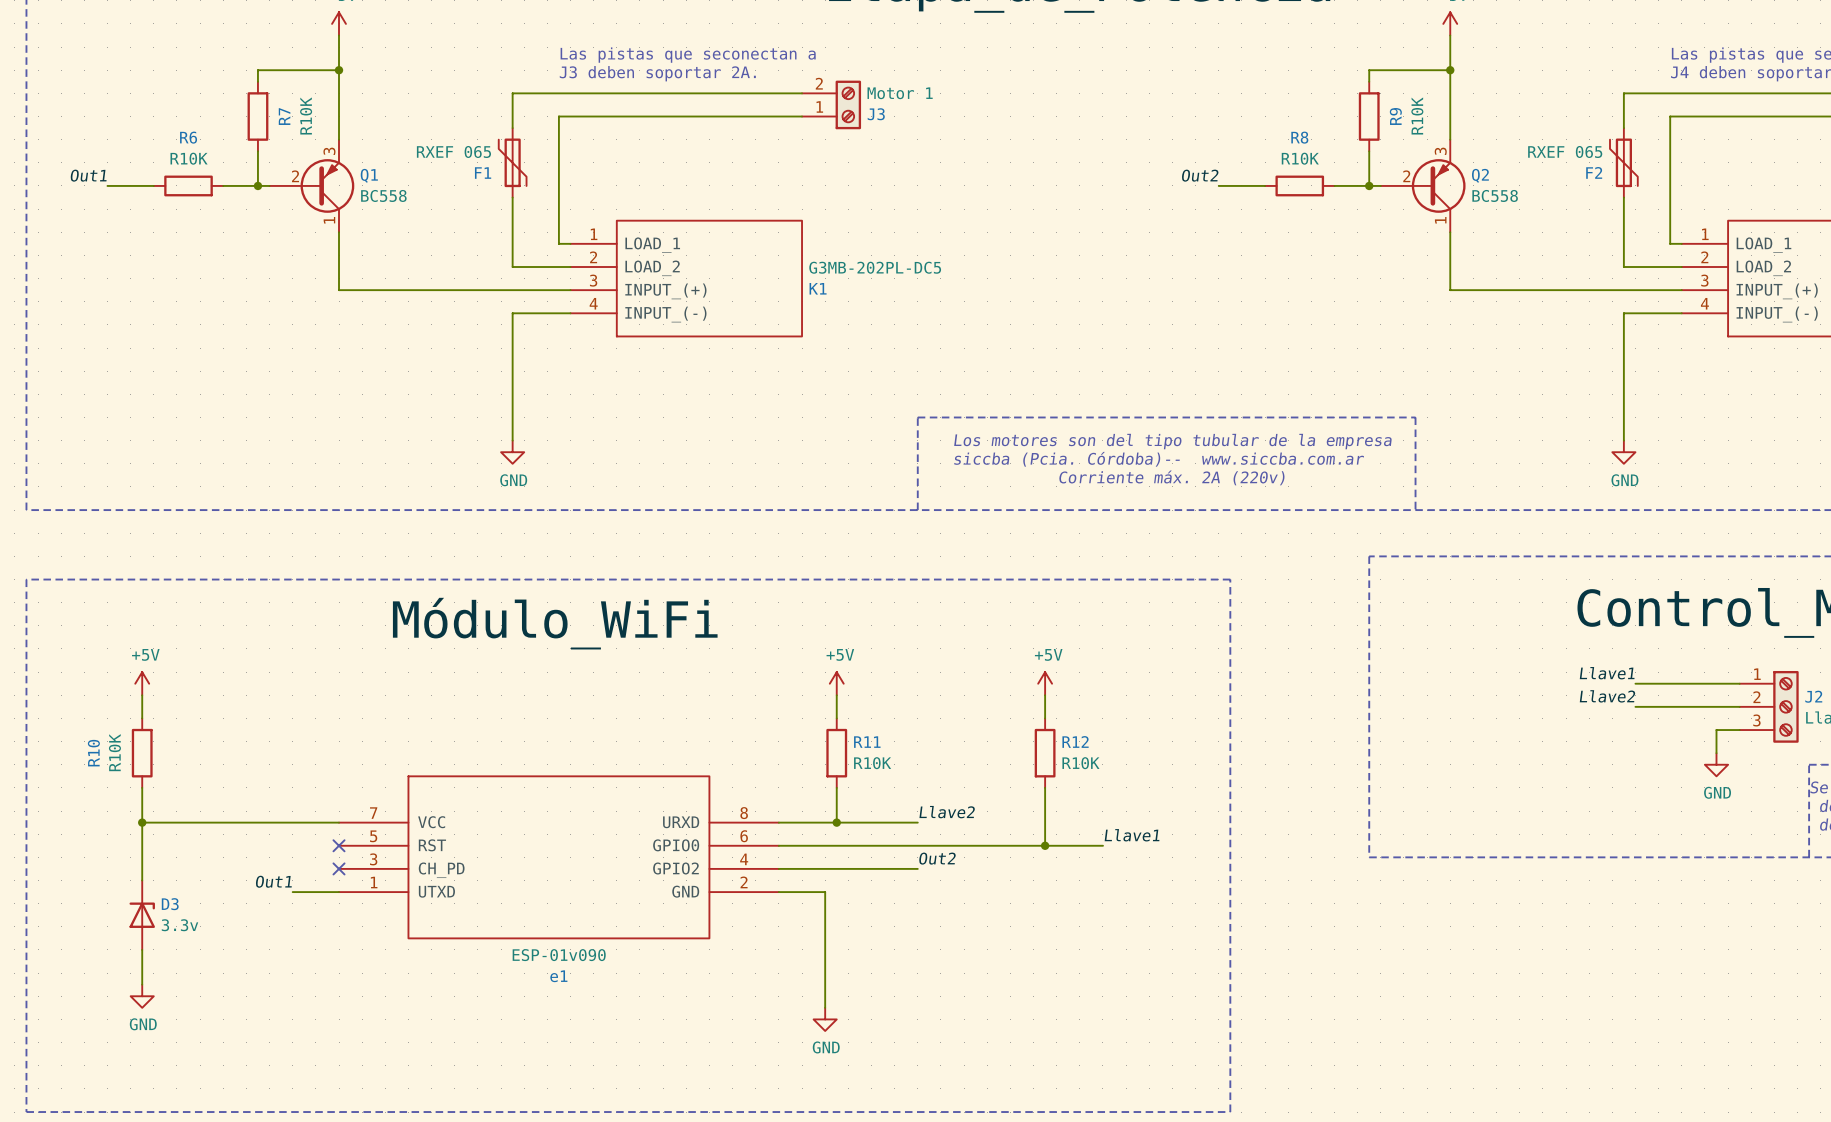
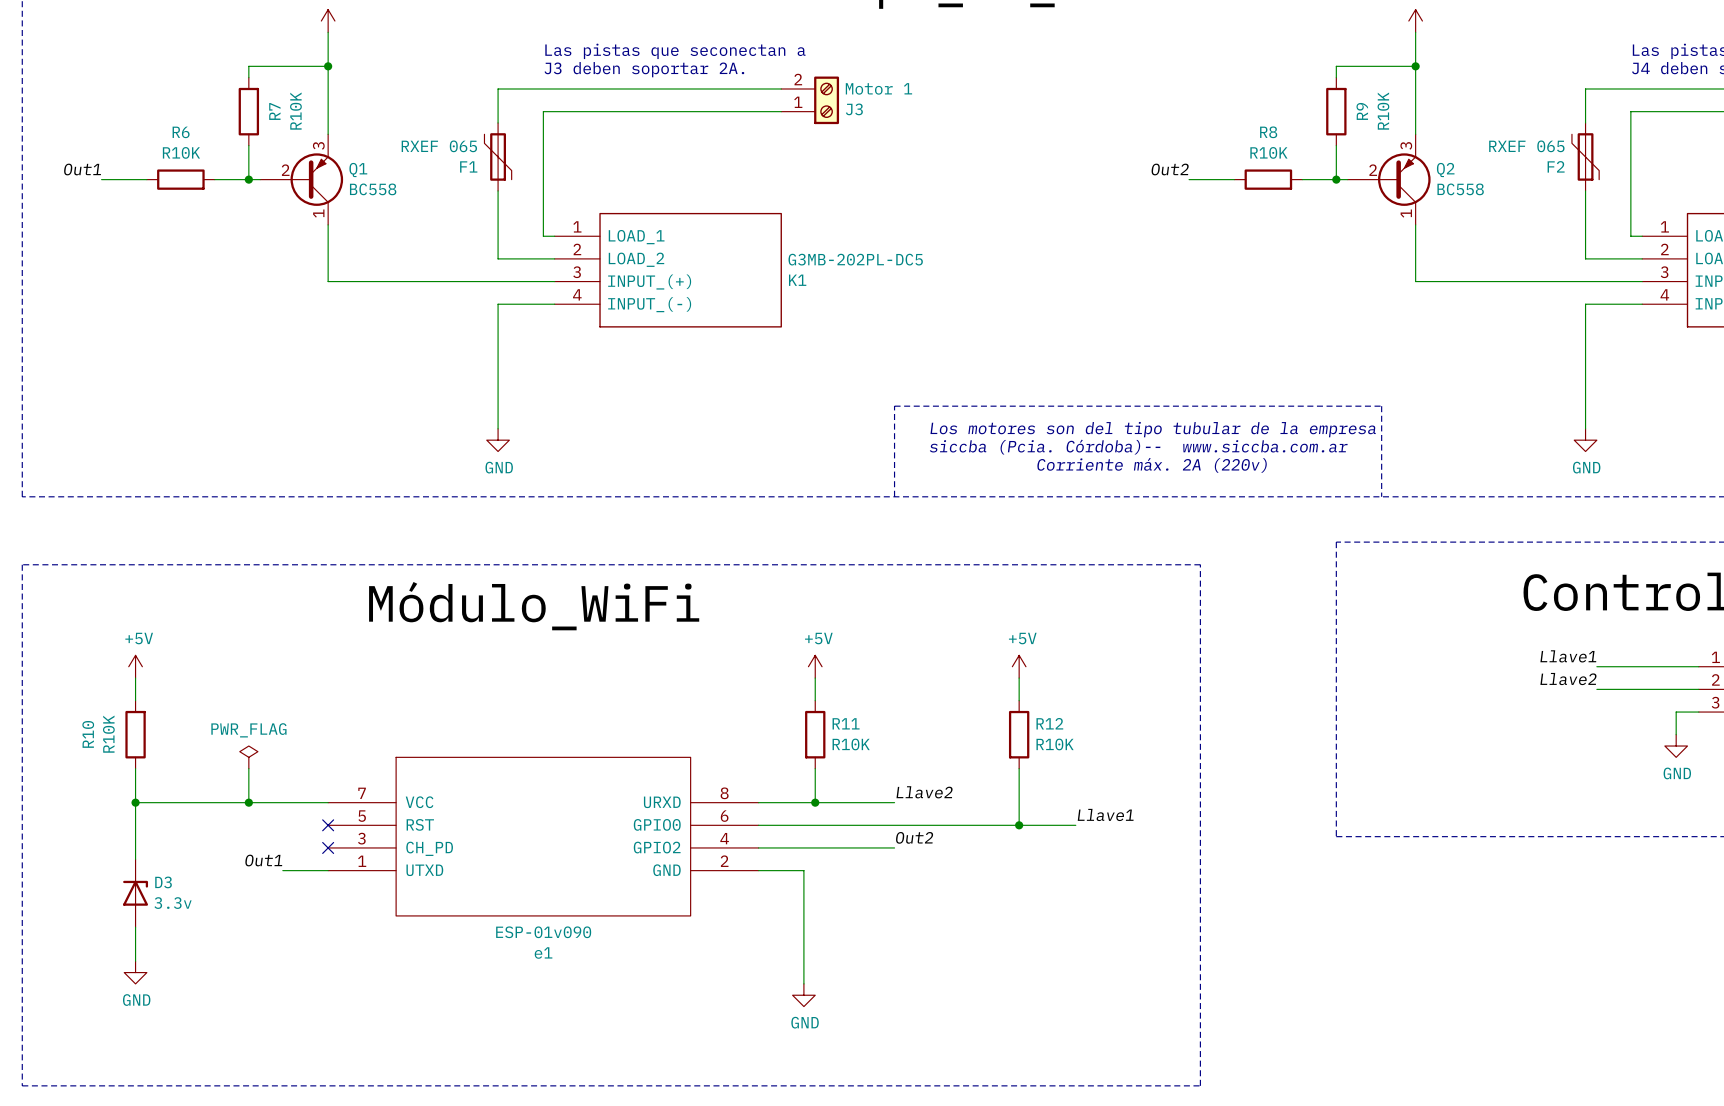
power symbol: none -> PWR_FLAG (248, 757)
wire: none -> (248, 768) (248, 802)
junction: none -> (248, 802)

